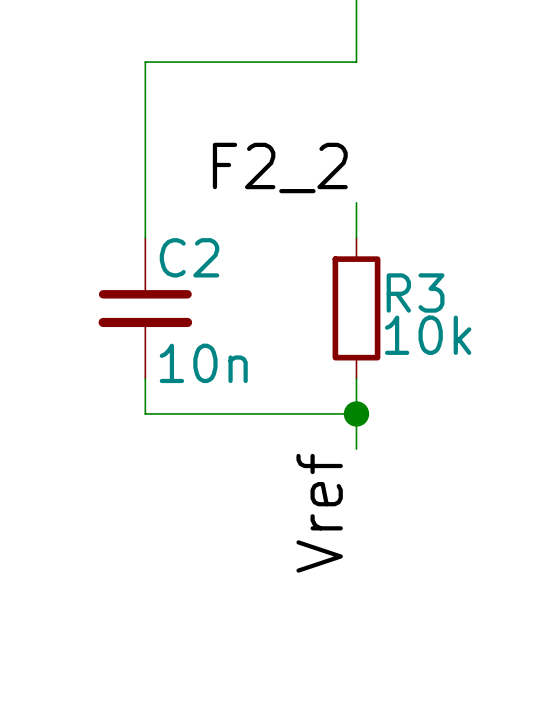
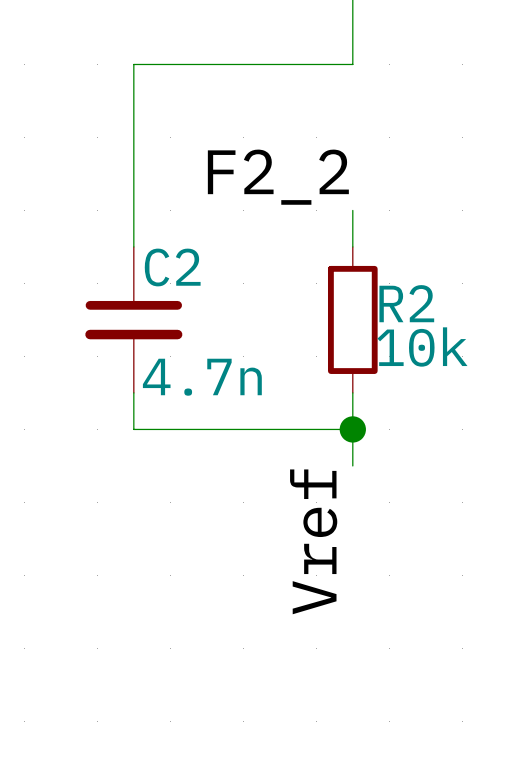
R3 name: R3 (415, 293) -> R2 (406, 303)
C2 value: 10n (203, 363) -> 4.7n (202, 377)

